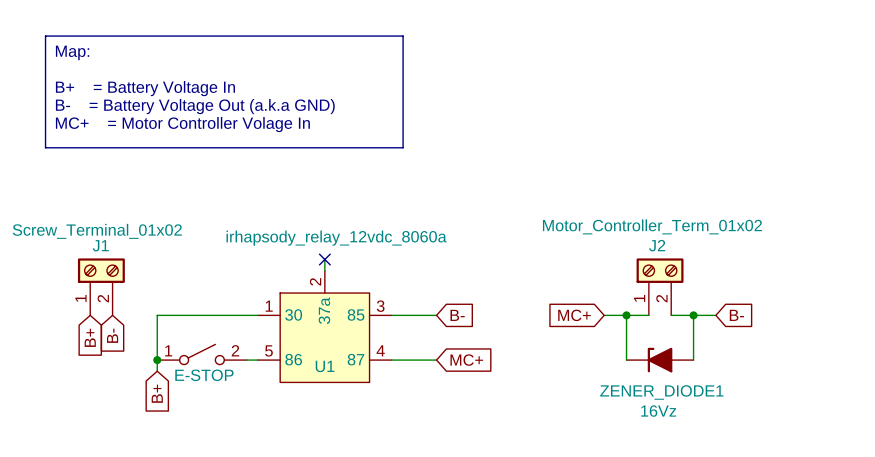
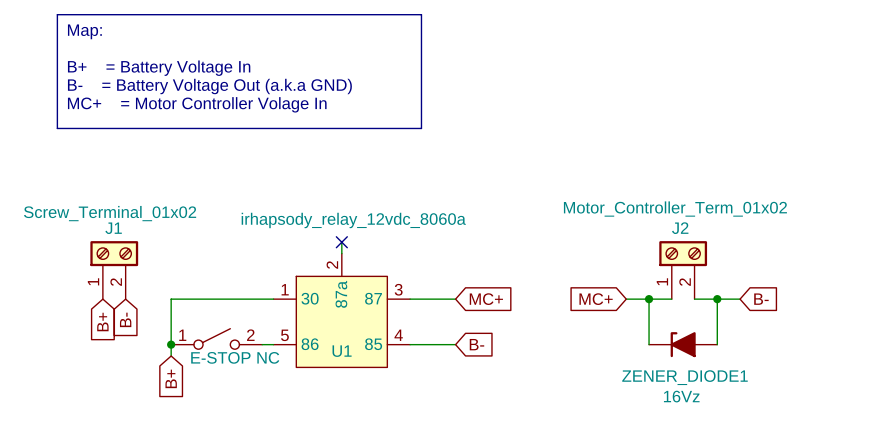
U1 pin name: 37a (324, 310) -> 87a (341, 294)
U1 pin name: 85 (356, 314) -> 87 (373, 298)
global label: B- (457, 315) -> MC+ (486, 299)
U1 pin name: 87 (355, 359) -> 85 (373, 344)
global label: MC+ (466, 360) -> B- (476, 344)
part value: E-STOP (204, 375) -> E-STOP NC (235, 357)

